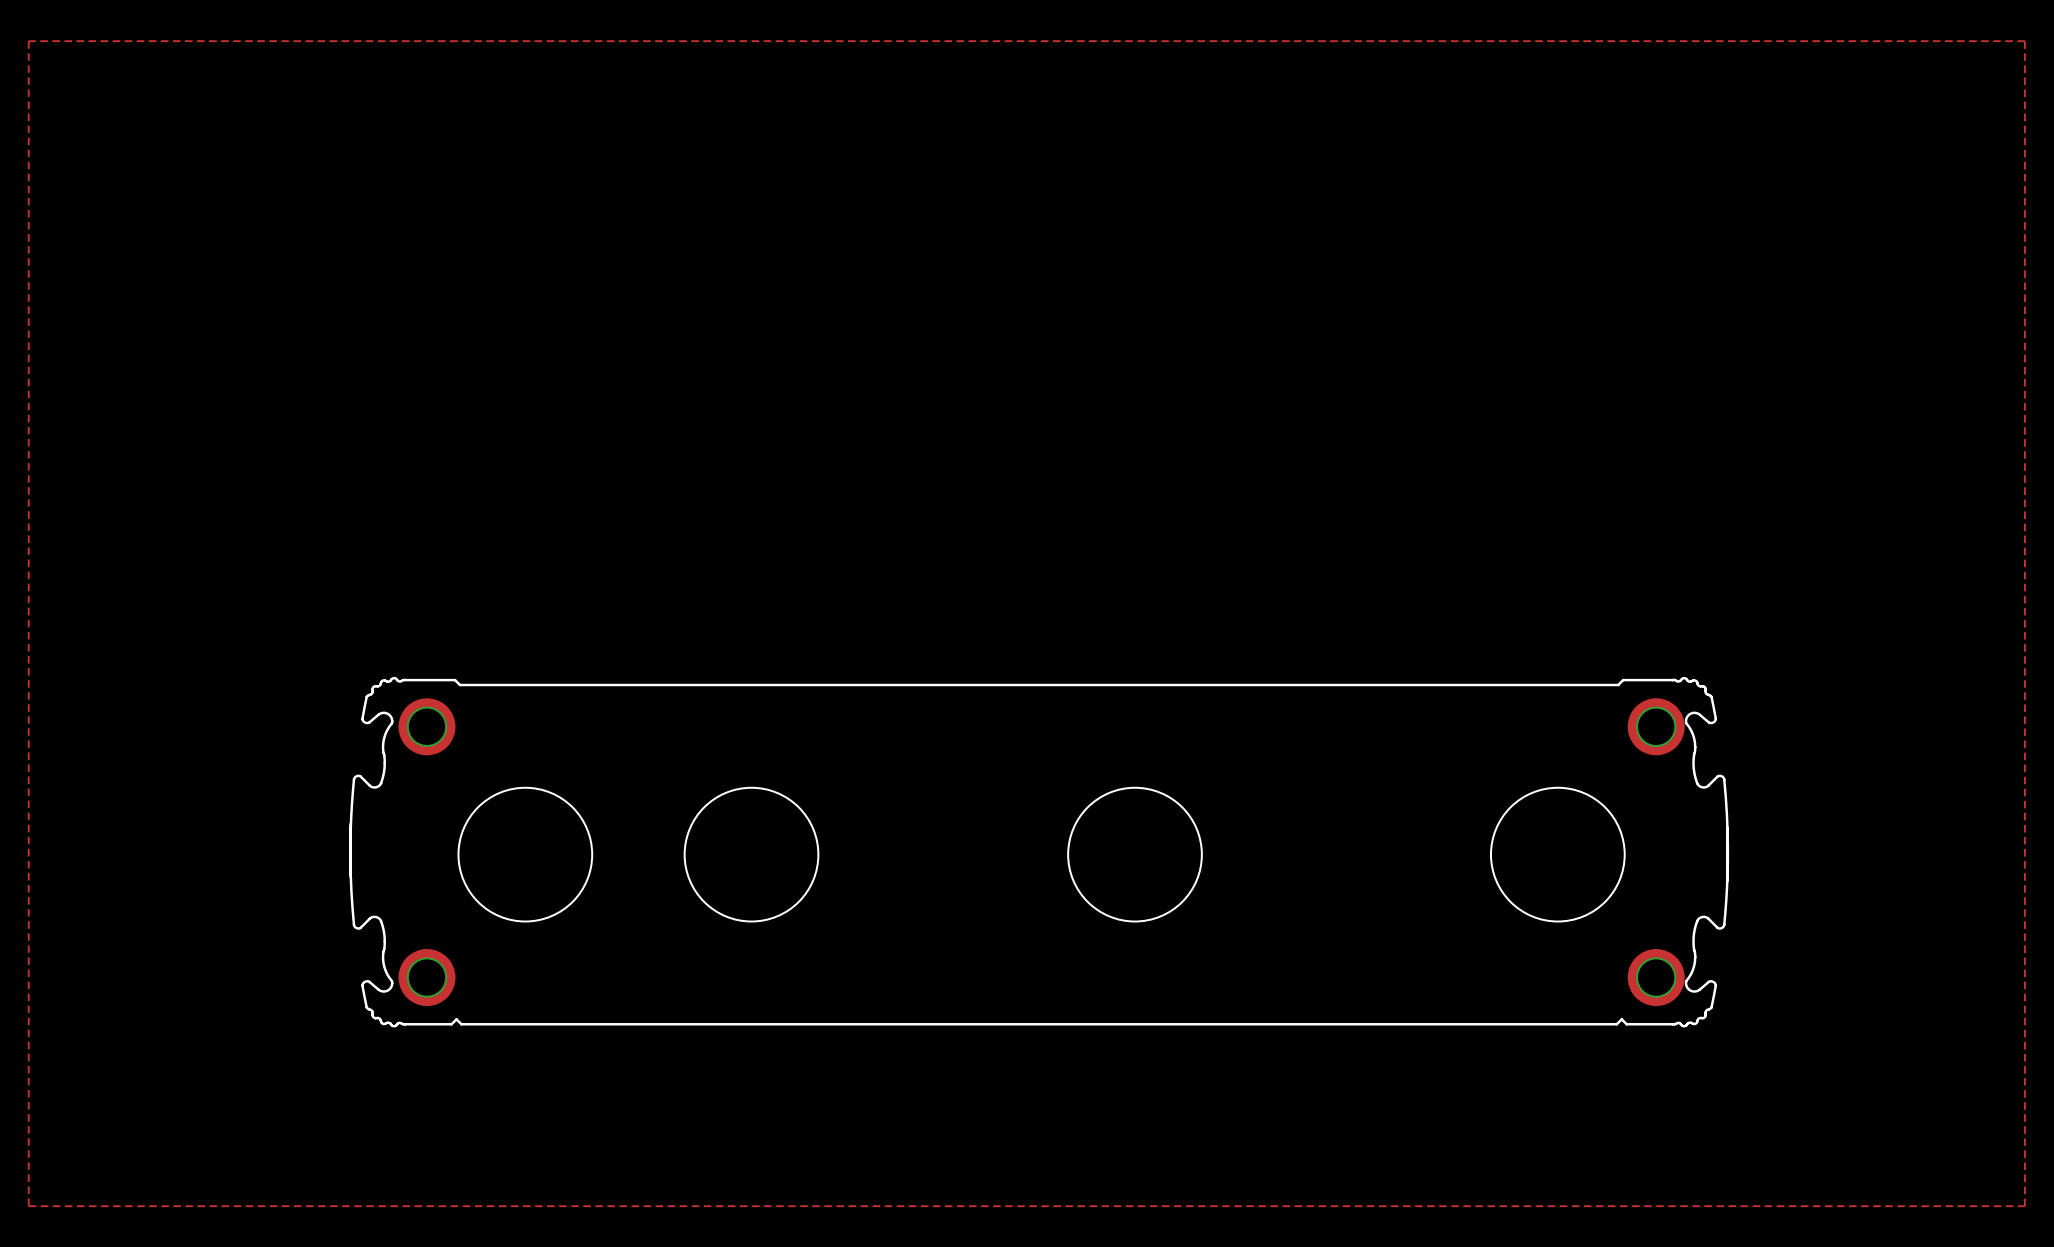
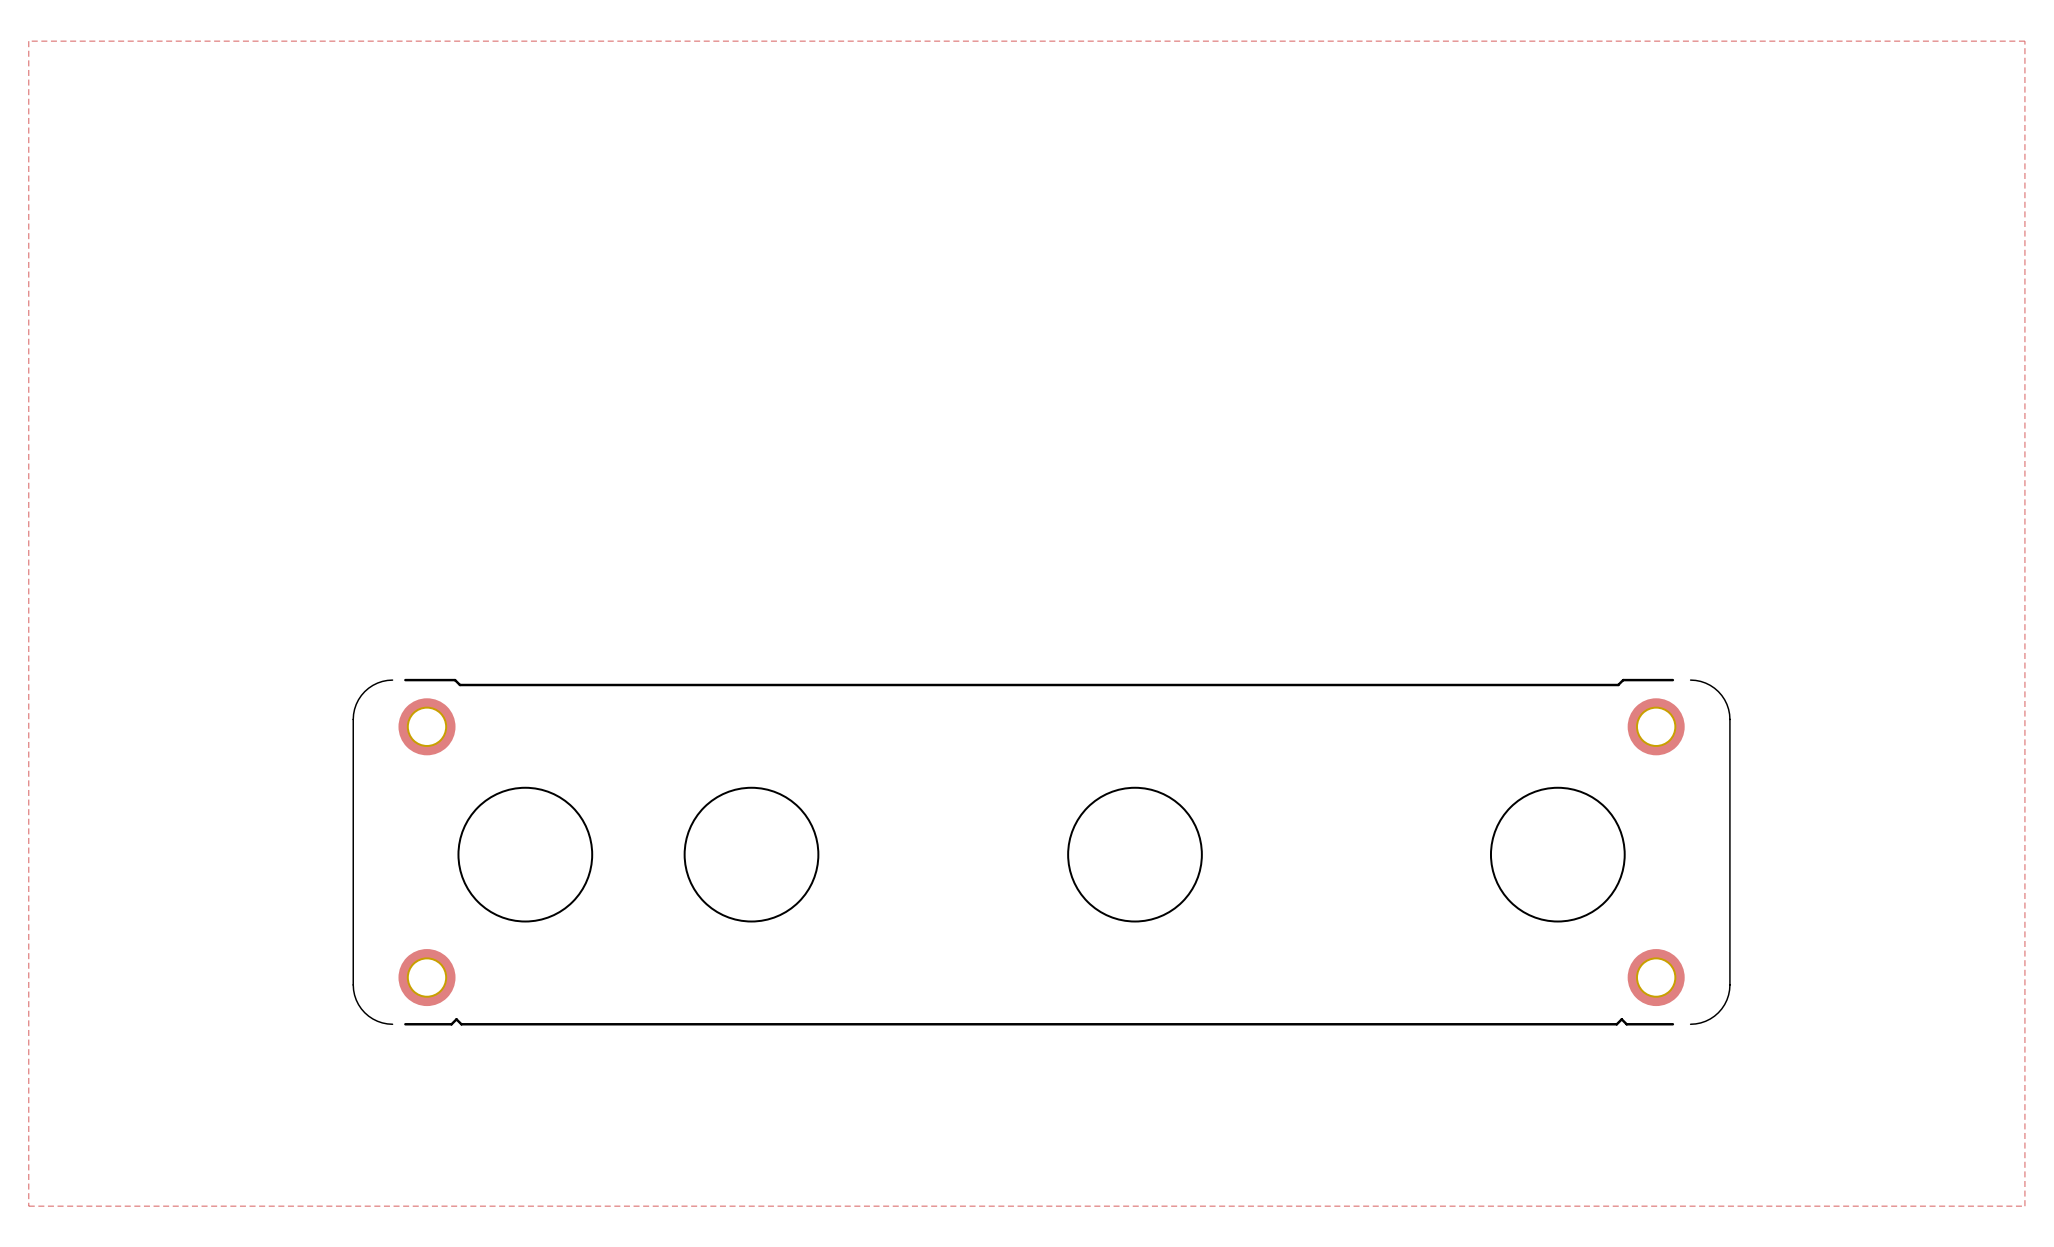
board edge: none -> (392, 680) (377, 683) (364, 691) (356, 704) (353, 719) (353, 990) (358, 1004) (368, 1016) (382, 1022) (392, 1024)
board edge: (405, 680) (399, 681) (394, 678) (388, 681) (382, 680) (379, 685) (373, 687) (372, 693) (366, 696) (363, 721) (368, 722) (379, 714) (384, 712) (389, 715) (392, 722) (383, 740) (384, 768) (380, 784) (371, 786) (359, 775) (354, 779) (350, 827) (350, 876) -> none
board edge: (1672, 680) (1678, 681) (1684, 678) (1689, 681) (1695, 680) (1698, 685) (1704, 687) (1705, 693) (1711, 696) (1714, 721) (1709, 722) (1699, 714) (1693, 712) (1687, 716) (1686, 722) (1694, 738) (1693, 769) (1698, 784) (1706, 787) (1718, 775) (1724, 779) (1727, 830) (1727, 880) -> none
board edge: none -> (1690, 680) (1705, 683) (1718, 691) (1726, 704) (1729, 719) (1729, 990) (1724, 1004) (1718, 1012) (1705, 1021) (1690, 1024)
board edge: (350, 823) (350, 874) (354, 925) (359, 928) (371, 917) (380, 919) (384, 936) (383, 963) (392, 982) (389, 988) (384, 991) (379, 990) (368, 981) (363, 982) (366, 1007) (372, 1011) (373, 1017) (379, 1018) (382, 1023) (388, 1022) (394, 1026) (399, 1022) (405, 1024) -> none
board edge: (1727, 827) (1727, 876) (1724, 925) (1718, 928) (1706, 917) (1698, 919) (1693, 934) (1694, 965) (1686, 982) (1687, 988) (1693, 991) (1698, 990) (1709, 981) (1714, 982) (1711, 1007) (1706, 1011) (1704, 1017) (1698, 1018) (1695, 1023) (1689, 1022) (1684, 1026) (1678, 1022) (1672, 1024) -> none

